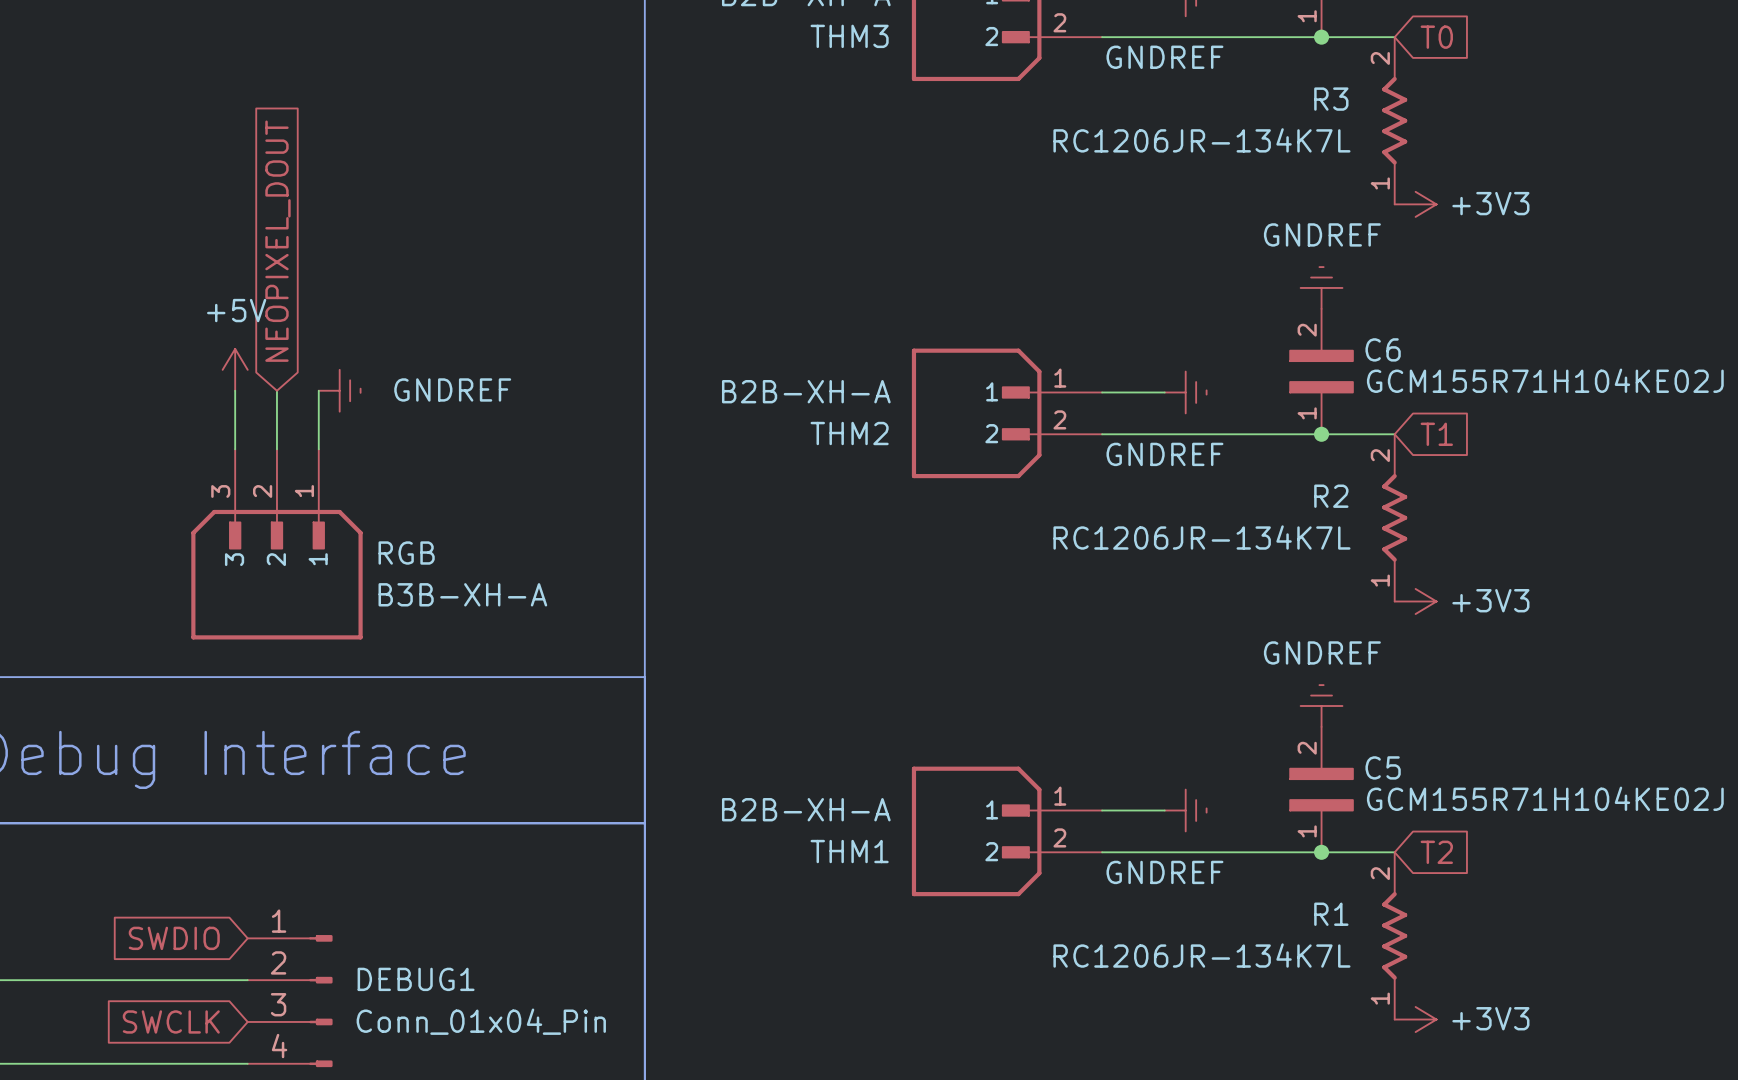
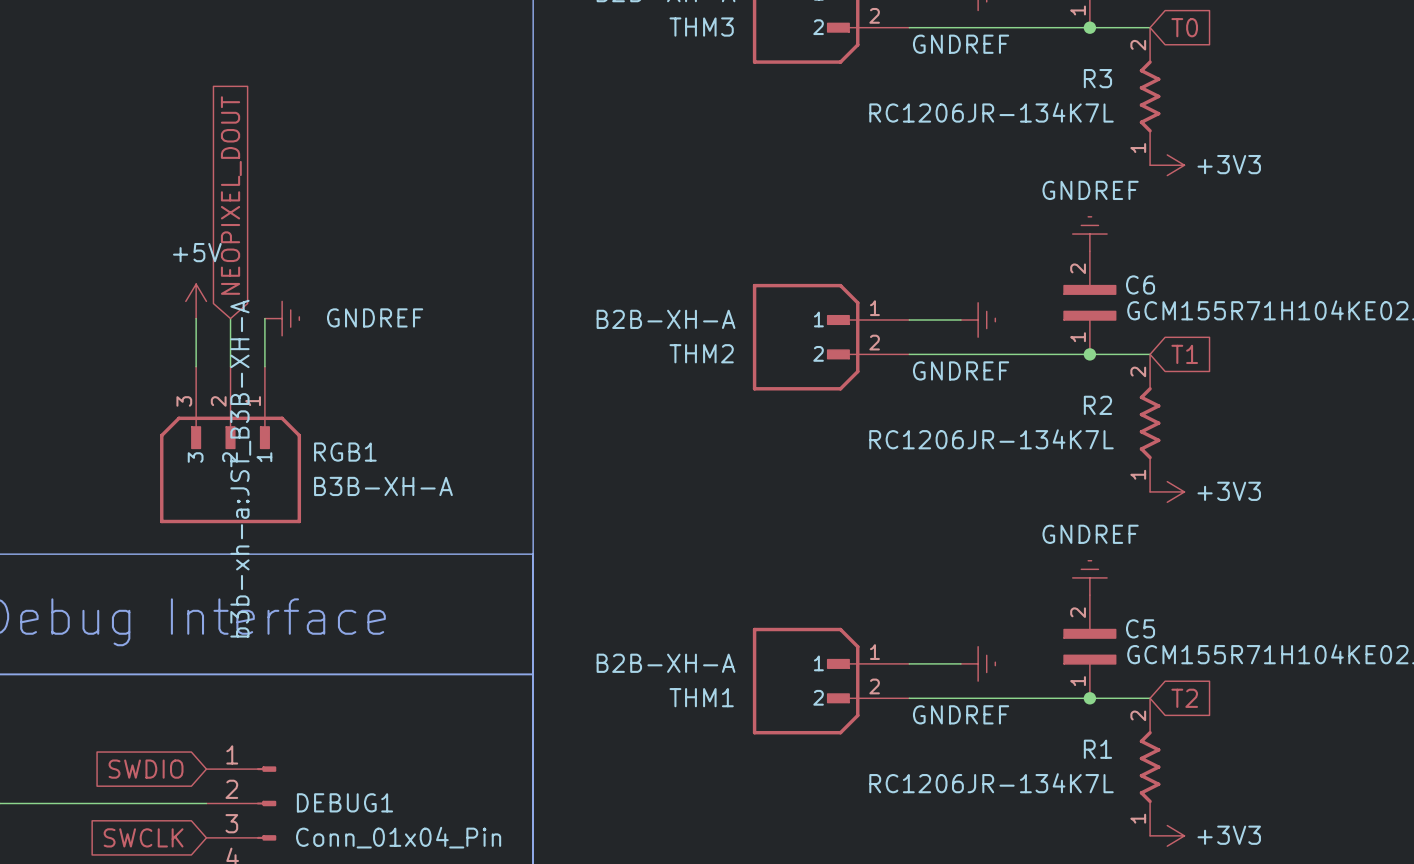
RGB name: RGB (406, 553) -> RGB1 (345, 452)
RGB text: none -> b3b-xh-a:JST_B3B-XH-A (240, 468)

